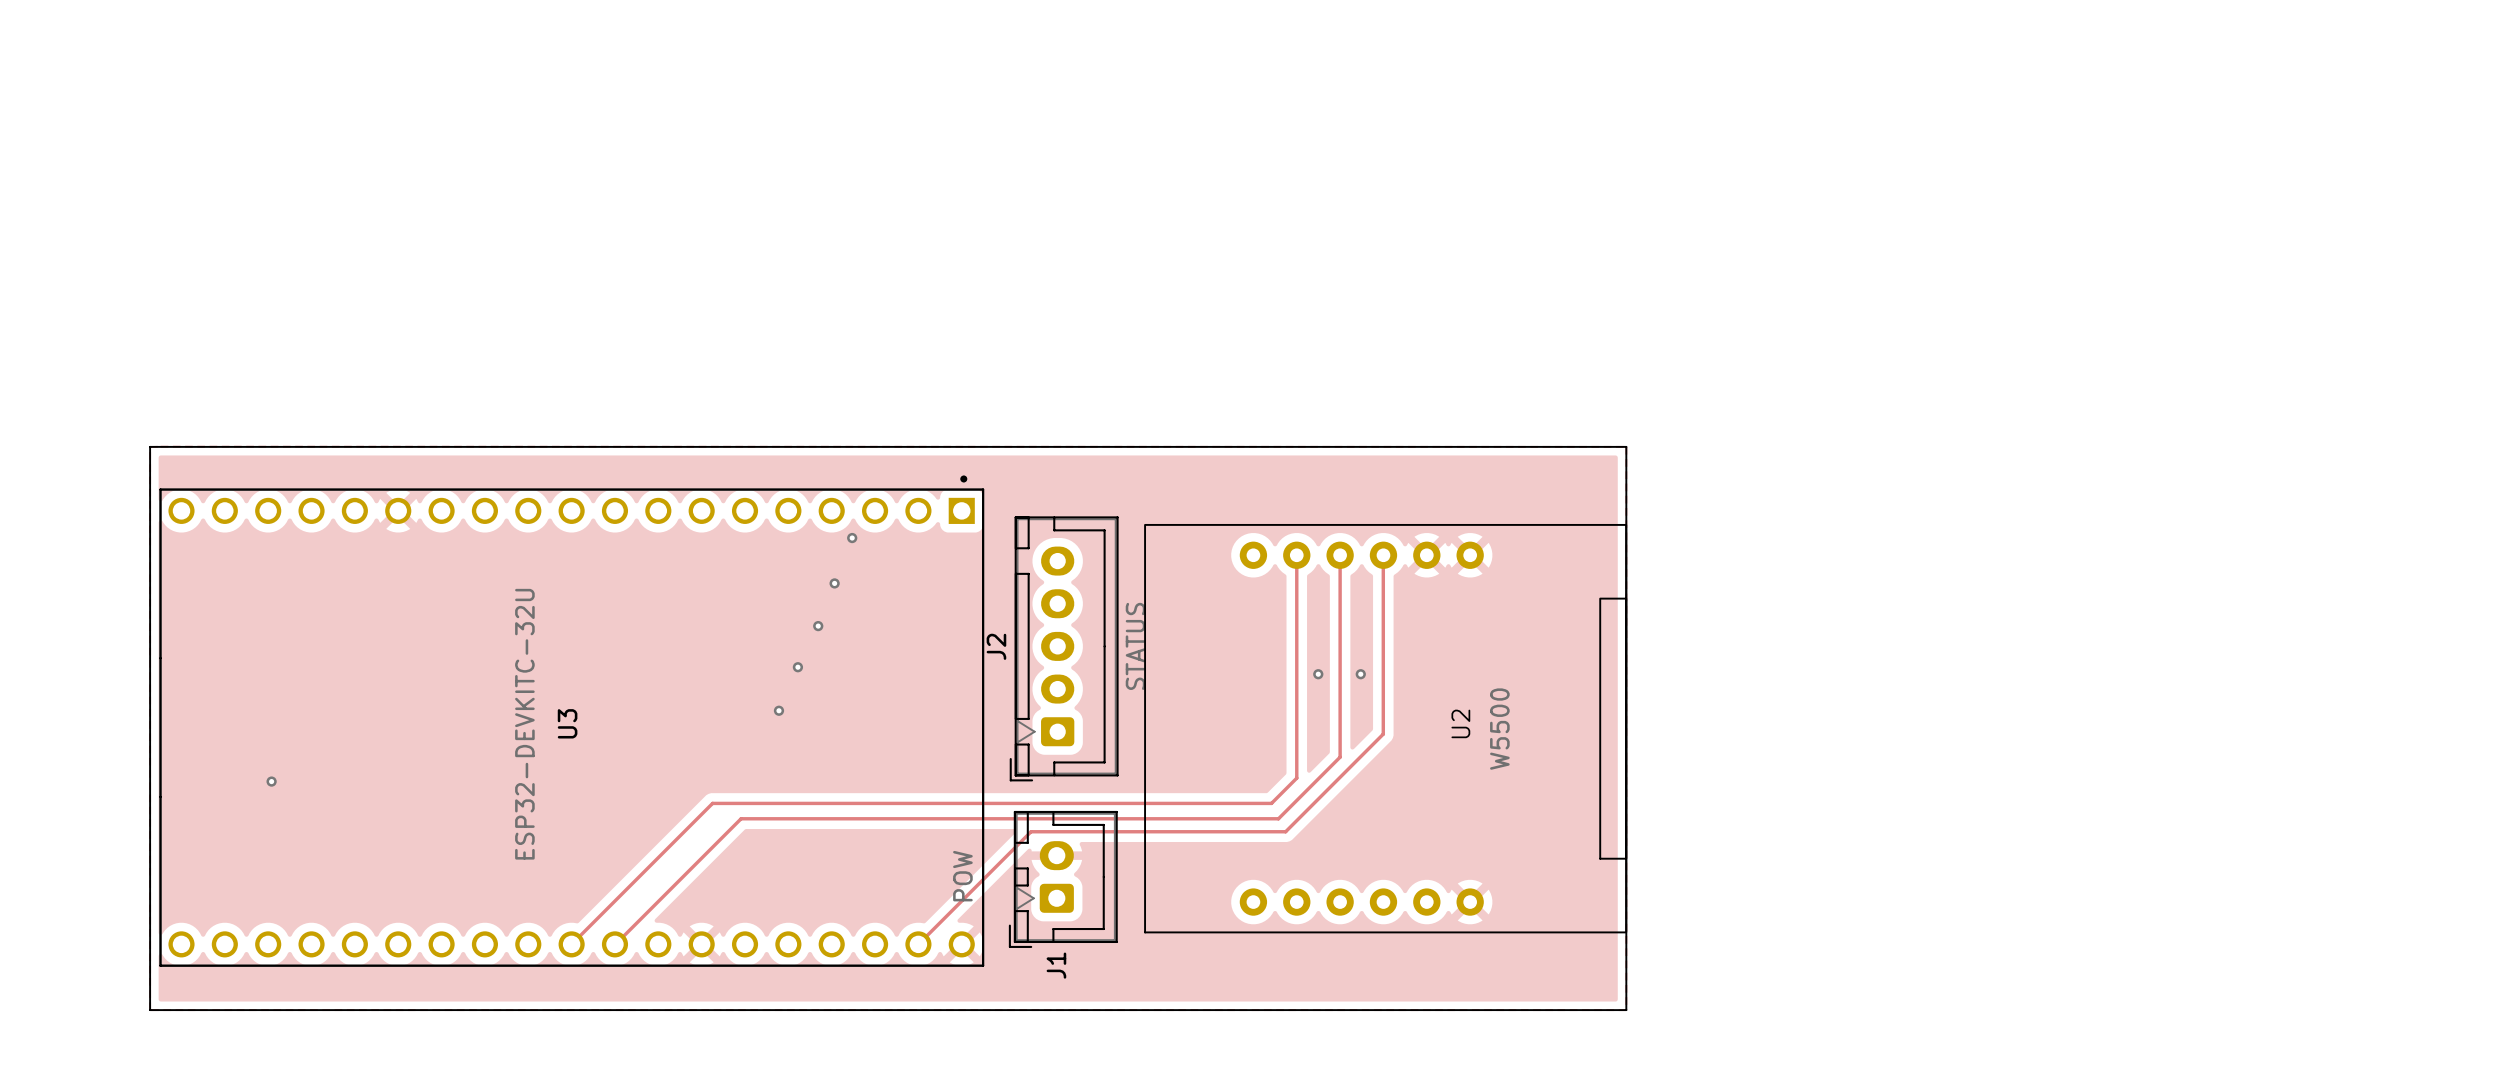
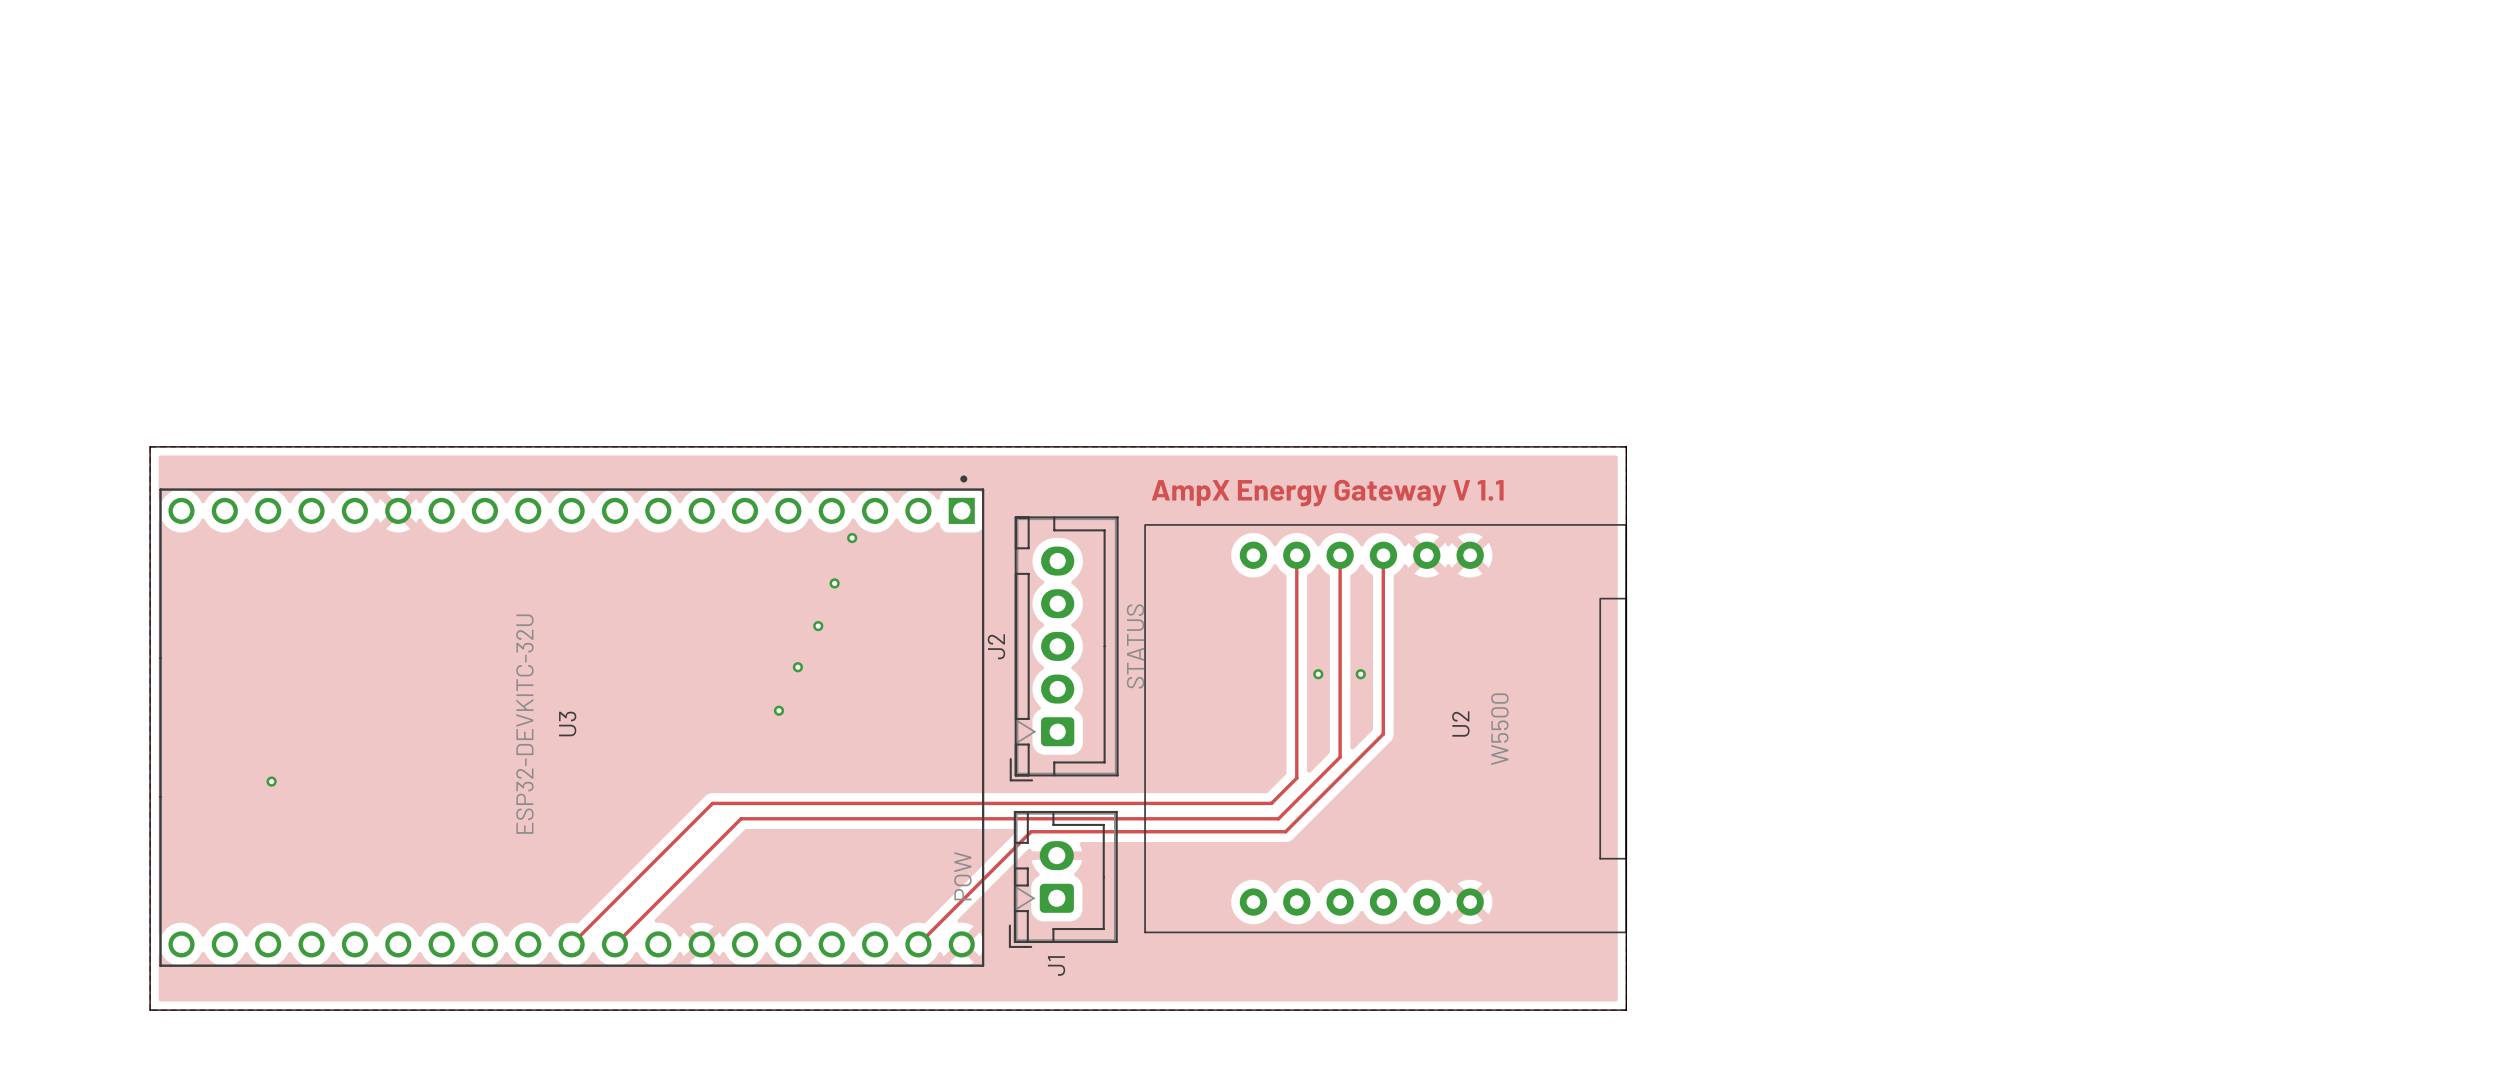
text: none -> AmpX Energy Gateway V 1.1 (1327, 493)

